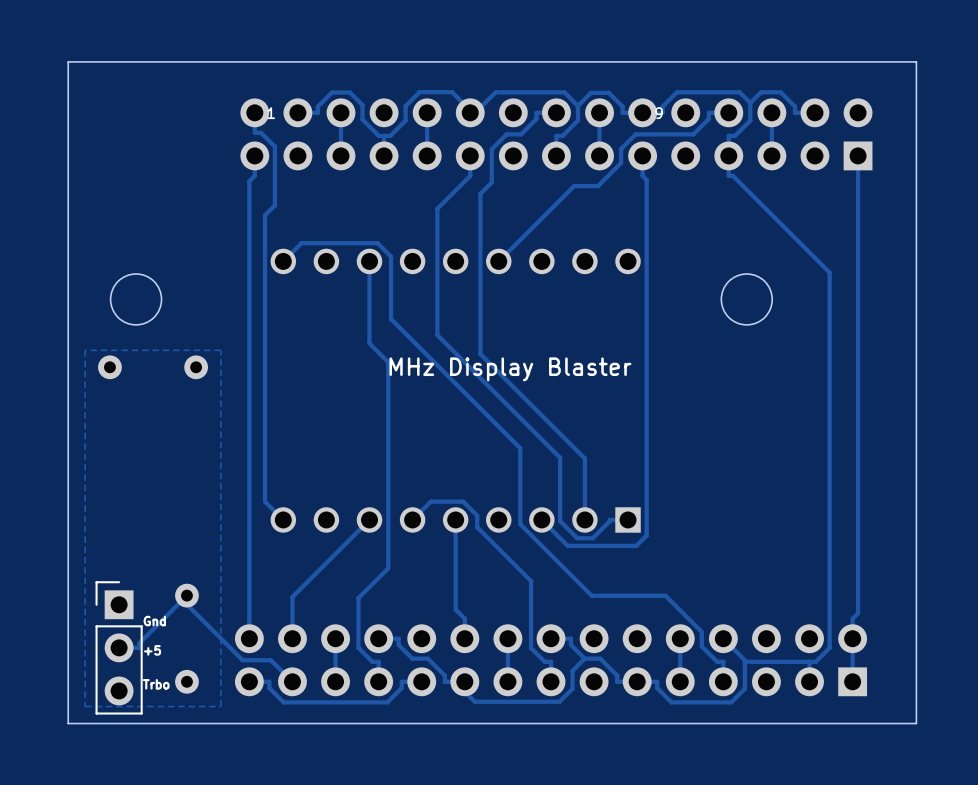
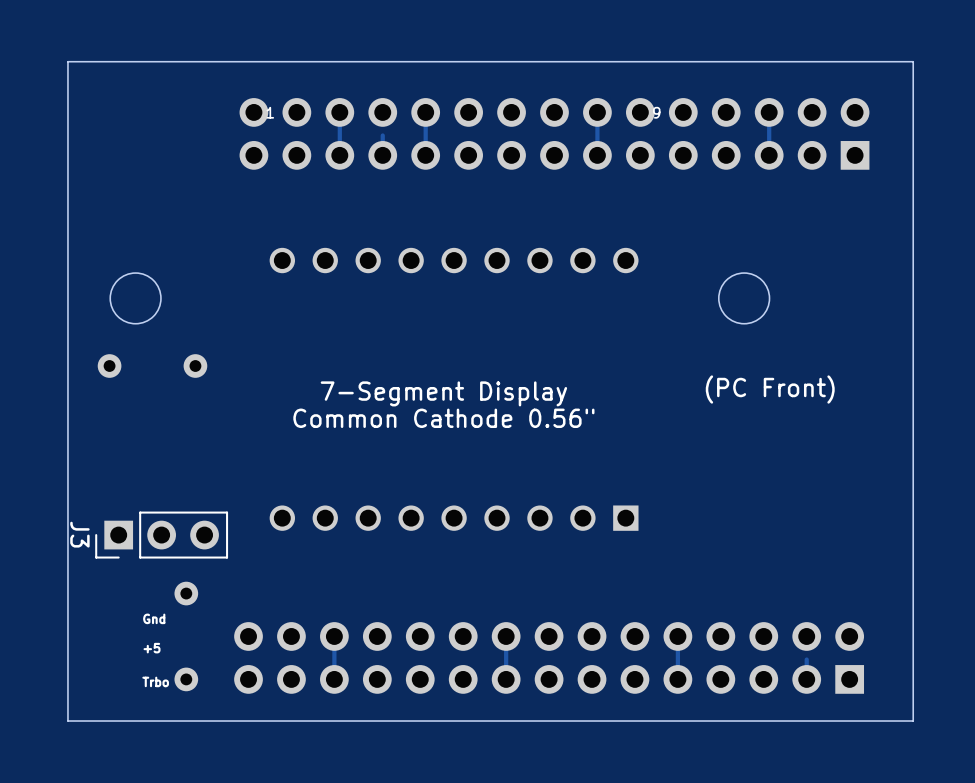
track: (750, 102) (739, 92) (676, 92) (662, 106) (662, 112) (622, 112) (622, 106) (608, 92) (591, 92) (577, 105) -> none
track: (750, 102) (750, 120) (735, 135) (728, 135) (728, 175) (732, 175) (829, 272) (829, 647) (815, 661) (744, 661) -> none
track: (750, 102) (760, 92) (780, 92) (795, 106) (795, 112) (814, 112) -> none
track: (577, 105) (564, 92) (495, 92) (475, 112) (470, 112) -> none
track: (577, 105) (577, 120) (562, 135) (556, 135) (556, 155) -> none
track: (254, 112) (254, 132) (261, 132) (274, 146) (274, 205) (265, 215) (265, 501) (283, 519) -> none
track: (472, 112) (452, 92) (419, 92) (405, 106) (405, 120) (390, 135) (378, 135) (362, 119) (362, 105) (349, 92) (331, 92) (317, 106) (317, 112) (297, 112) -> none
track: (556, 112) (536, 112) (536, 119) (521, 134) (506, 134) (491, 149) (491, 182) (480, 193) (480, 354) (584, 458) (584, 519) -> none
track: (728, 112) (708, 112) (708, 119) (693, 134) (635, 134) (621, 148) (621, 163) (598, 186) (574, 186) (498, 261) -> none
track: (254, 155) (254, 175) (249, 181) (249, 638) -> none
track: (470, 155) (470, 175) (437, 208) (437, 335) (560, 457) (560, 521) (577, 538) (592, 538) (609, 519) (628, 519) -> none
track: (642, 155) (642, 175) (646, 179) (646, 535) (636, 545) (567, 545) (541, 519) -> none
track: (858, 155) (858, 613) (852, 618) (852, 681) -> none
track: (283, 261) (301, 243) (377, 243) (391, 256) (391, 319) (520, 448) (520, 524) (591, 595) (665, 595) (701, 631) (701, 646) (717, 661) (723, 661) (723, 681) -> none
track: (369, 261) (369, 343) (388, 362) (388, 568) (358, 598) (358, 647) (372, 661) (378, 661) (378, 681) -> none
zone outline: (220, 350) (85, 350) (85, 706) (220, 706) (220, 350) -> none
text: MHz Display Blaster (510, 369) -> none
text: none -> (PC Front) (770, 389)
text: none -> 7-Segment Display (443, 393)
text: none -> Common Cathode 0.56" (443, 418)
track: (369, 519) (292, 596) (292, 638) -> none
track: (412, 519) (430, 501) (463, 501) (477, 515) (477, 527) (531, 581) (531, 648) (544, 661) (551, 661) (551, 681) -> none
track: (455, 519) (455, 609) (464, 618) (464, 638) -> none
J3: none -> (161, 535)
track: (378, 638) (398, 638) (398, 644) (412, 658) (427, 658) (444, 675) (444, 681) (464, 681) -> none
track: (551, 638) (570, 638) (570, 644) (584, 658) -> none
track: (723, 638) (744, 660) (744, 688) (731, 702) (671, 702) (657, 688) (657, 681) (617, 681) (617, 675) (600, 658) (584, 658) -> none
track: (119, 647) (139, 647) (139, 643) (186, 595) (186, 604) (242, 660) (270, 660) (292, 681) -> none
part: (119, 647) -> none
track: (584, 658) (572, 670) (572, 688) (559, 701) (474, 701) (454, 681) -> none
track: (421, 681) (401, 681) (401, 688) (387, 702) (283, 702) (269, 688) (269, 681) (249, 681) -> none

